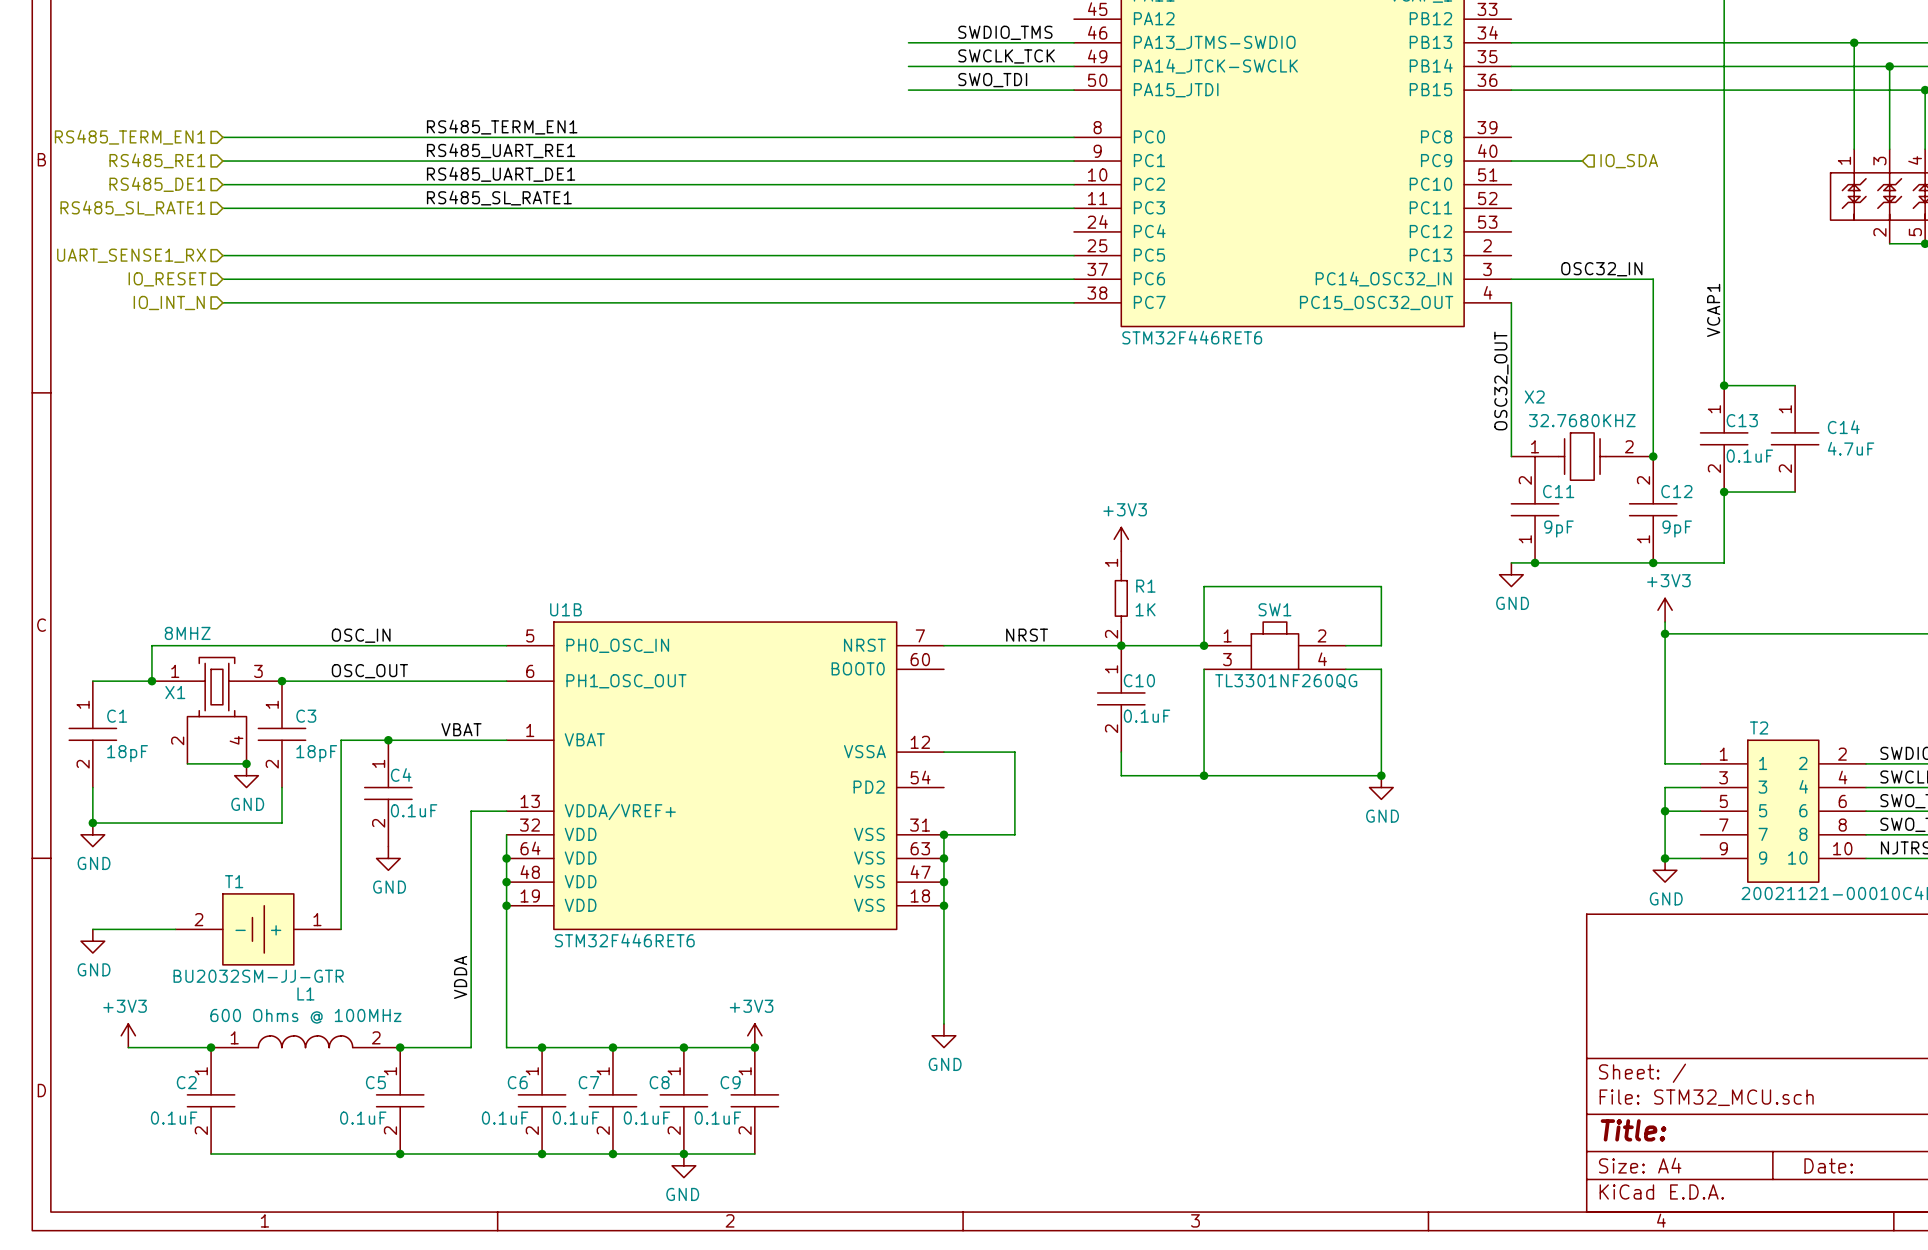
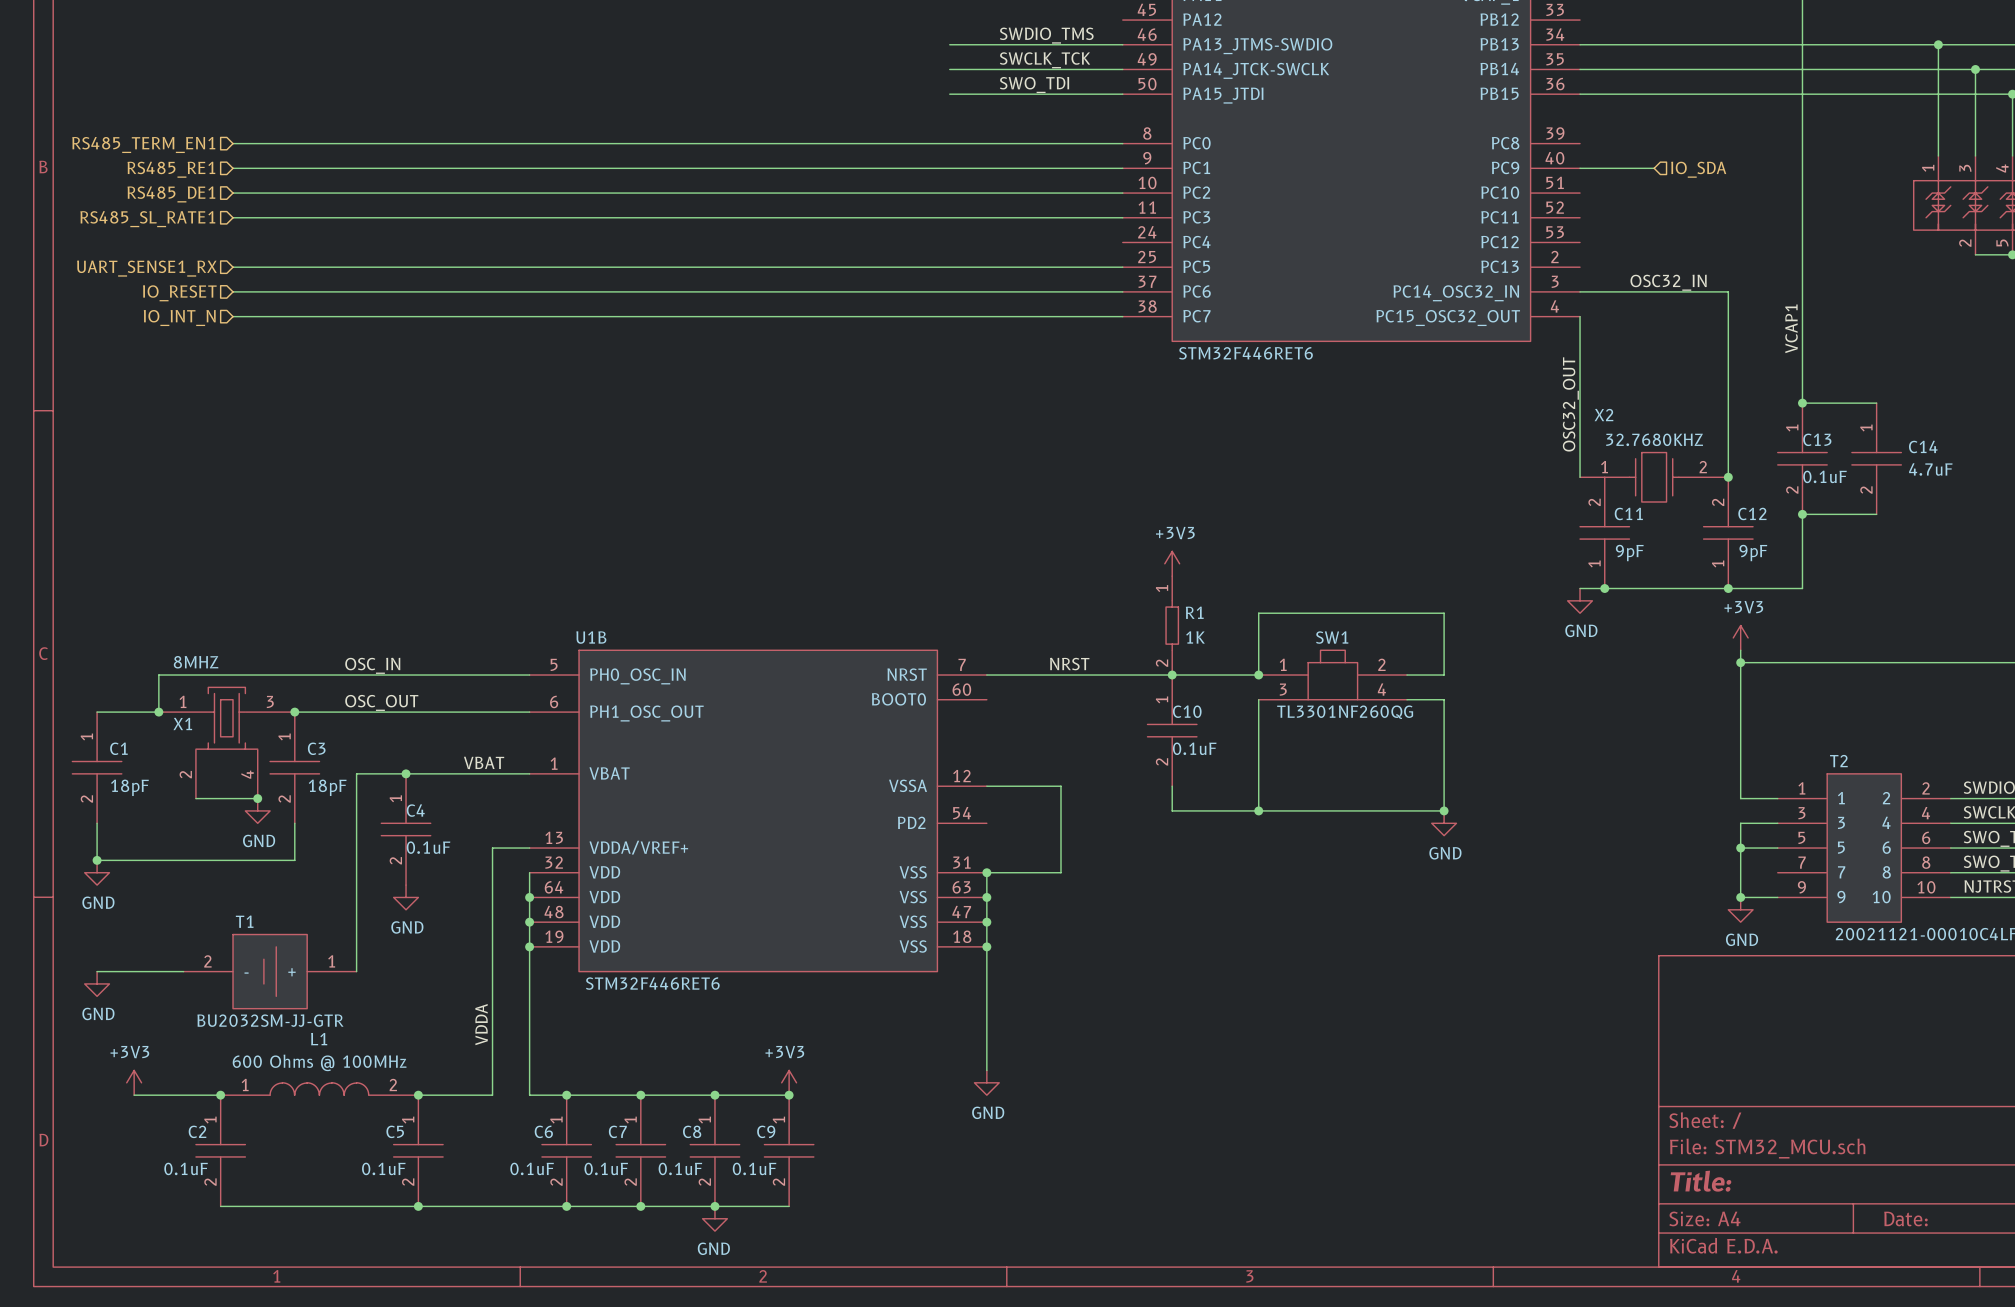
label: RS485_TERM_EN1 (502, 127) -> none
label: RS485_UART_RE1 (501, 150) -> none
label: RS485_UART_DE1 (501, 174) -> none
label: RS485_SL_RATE1 (499, 198) -> none

